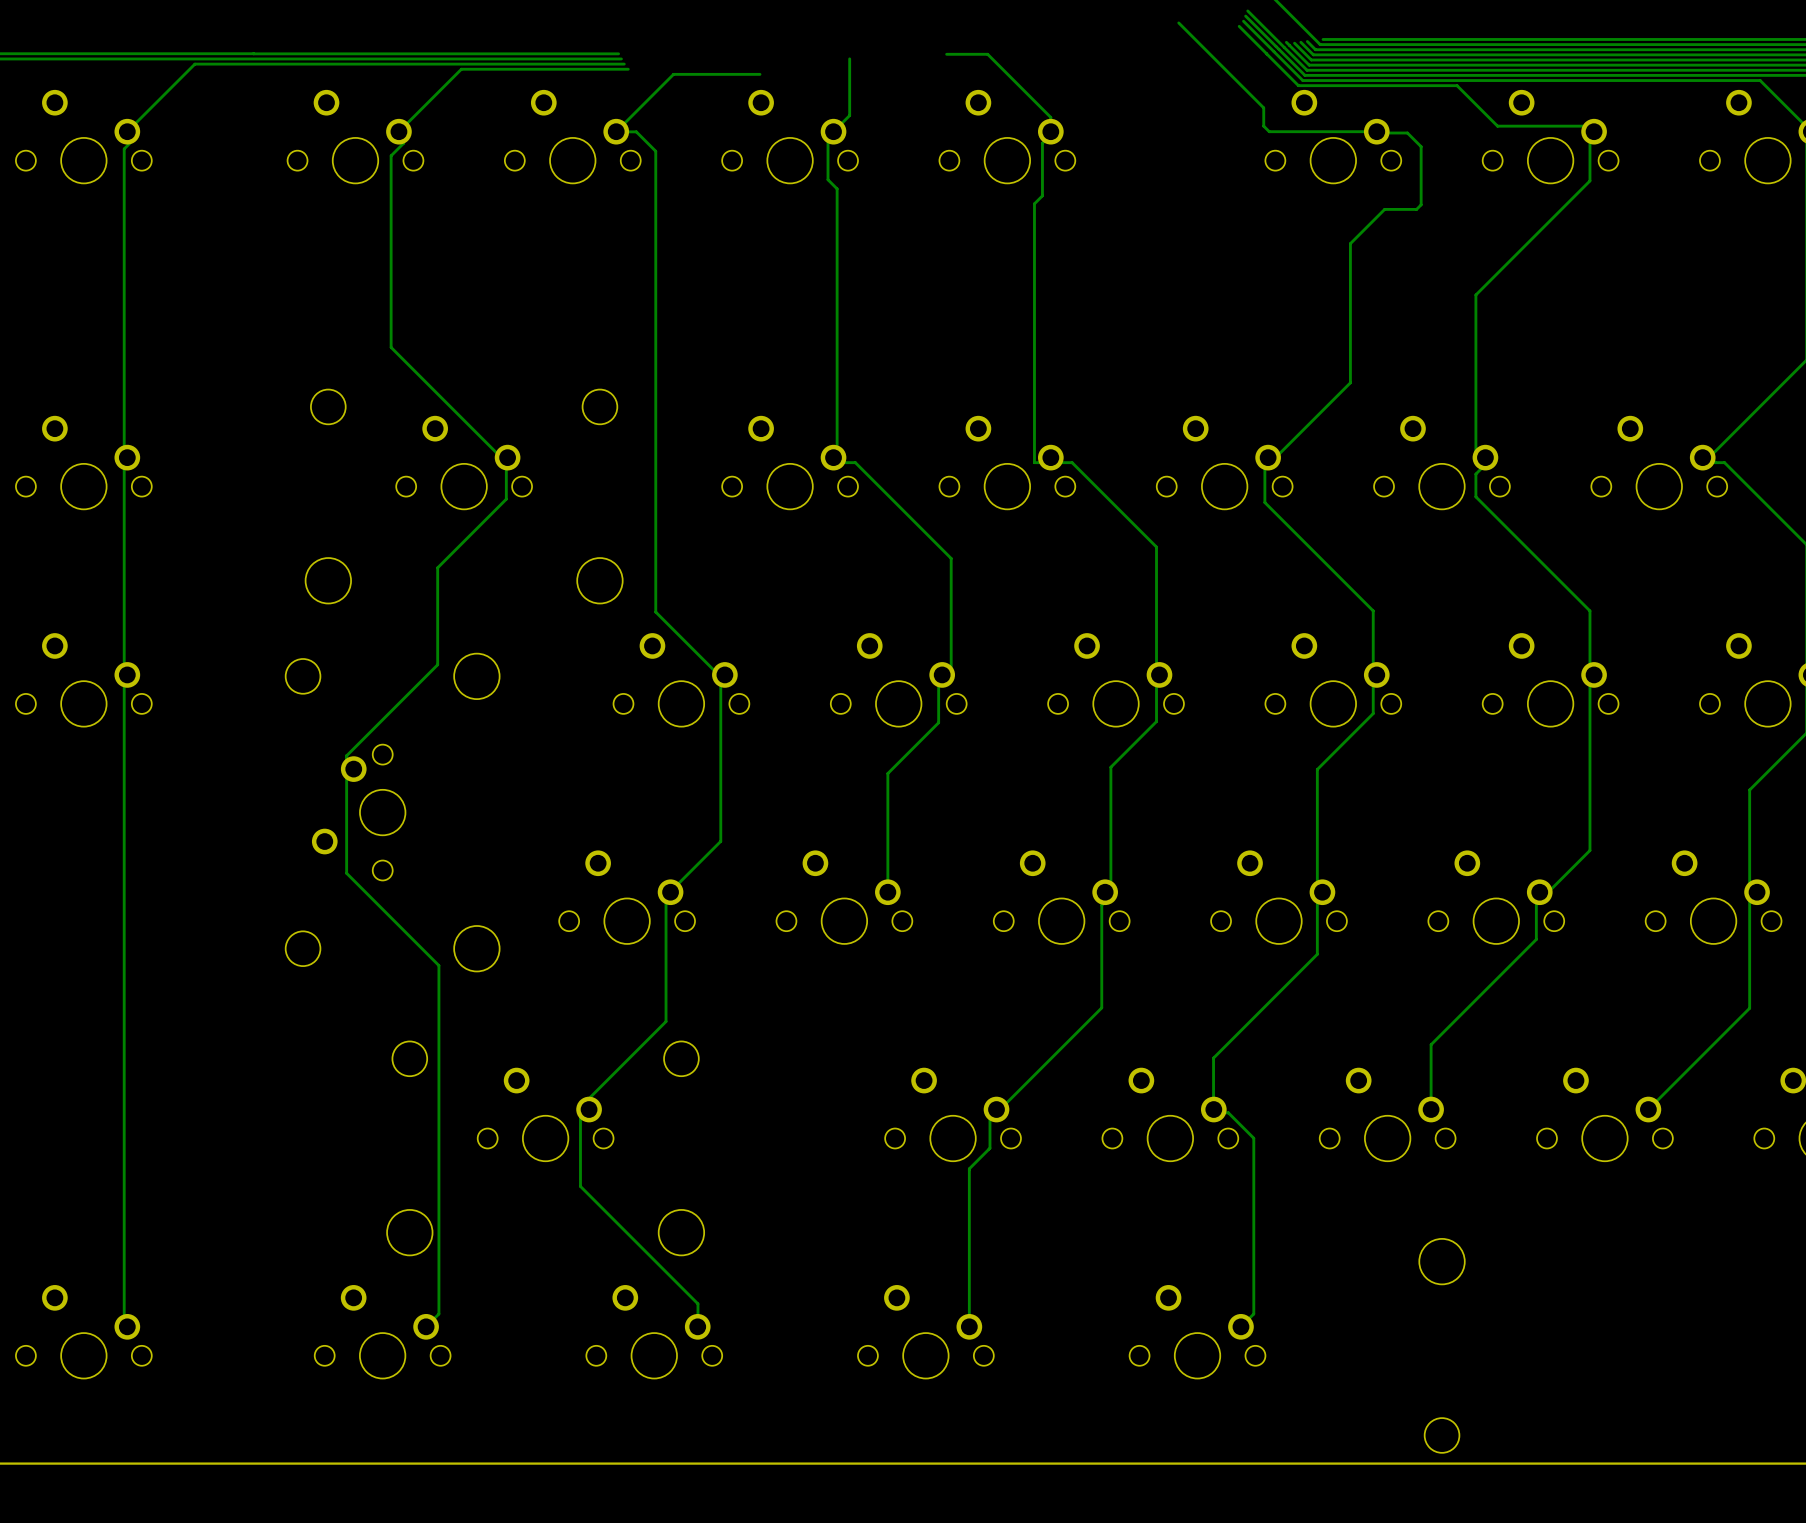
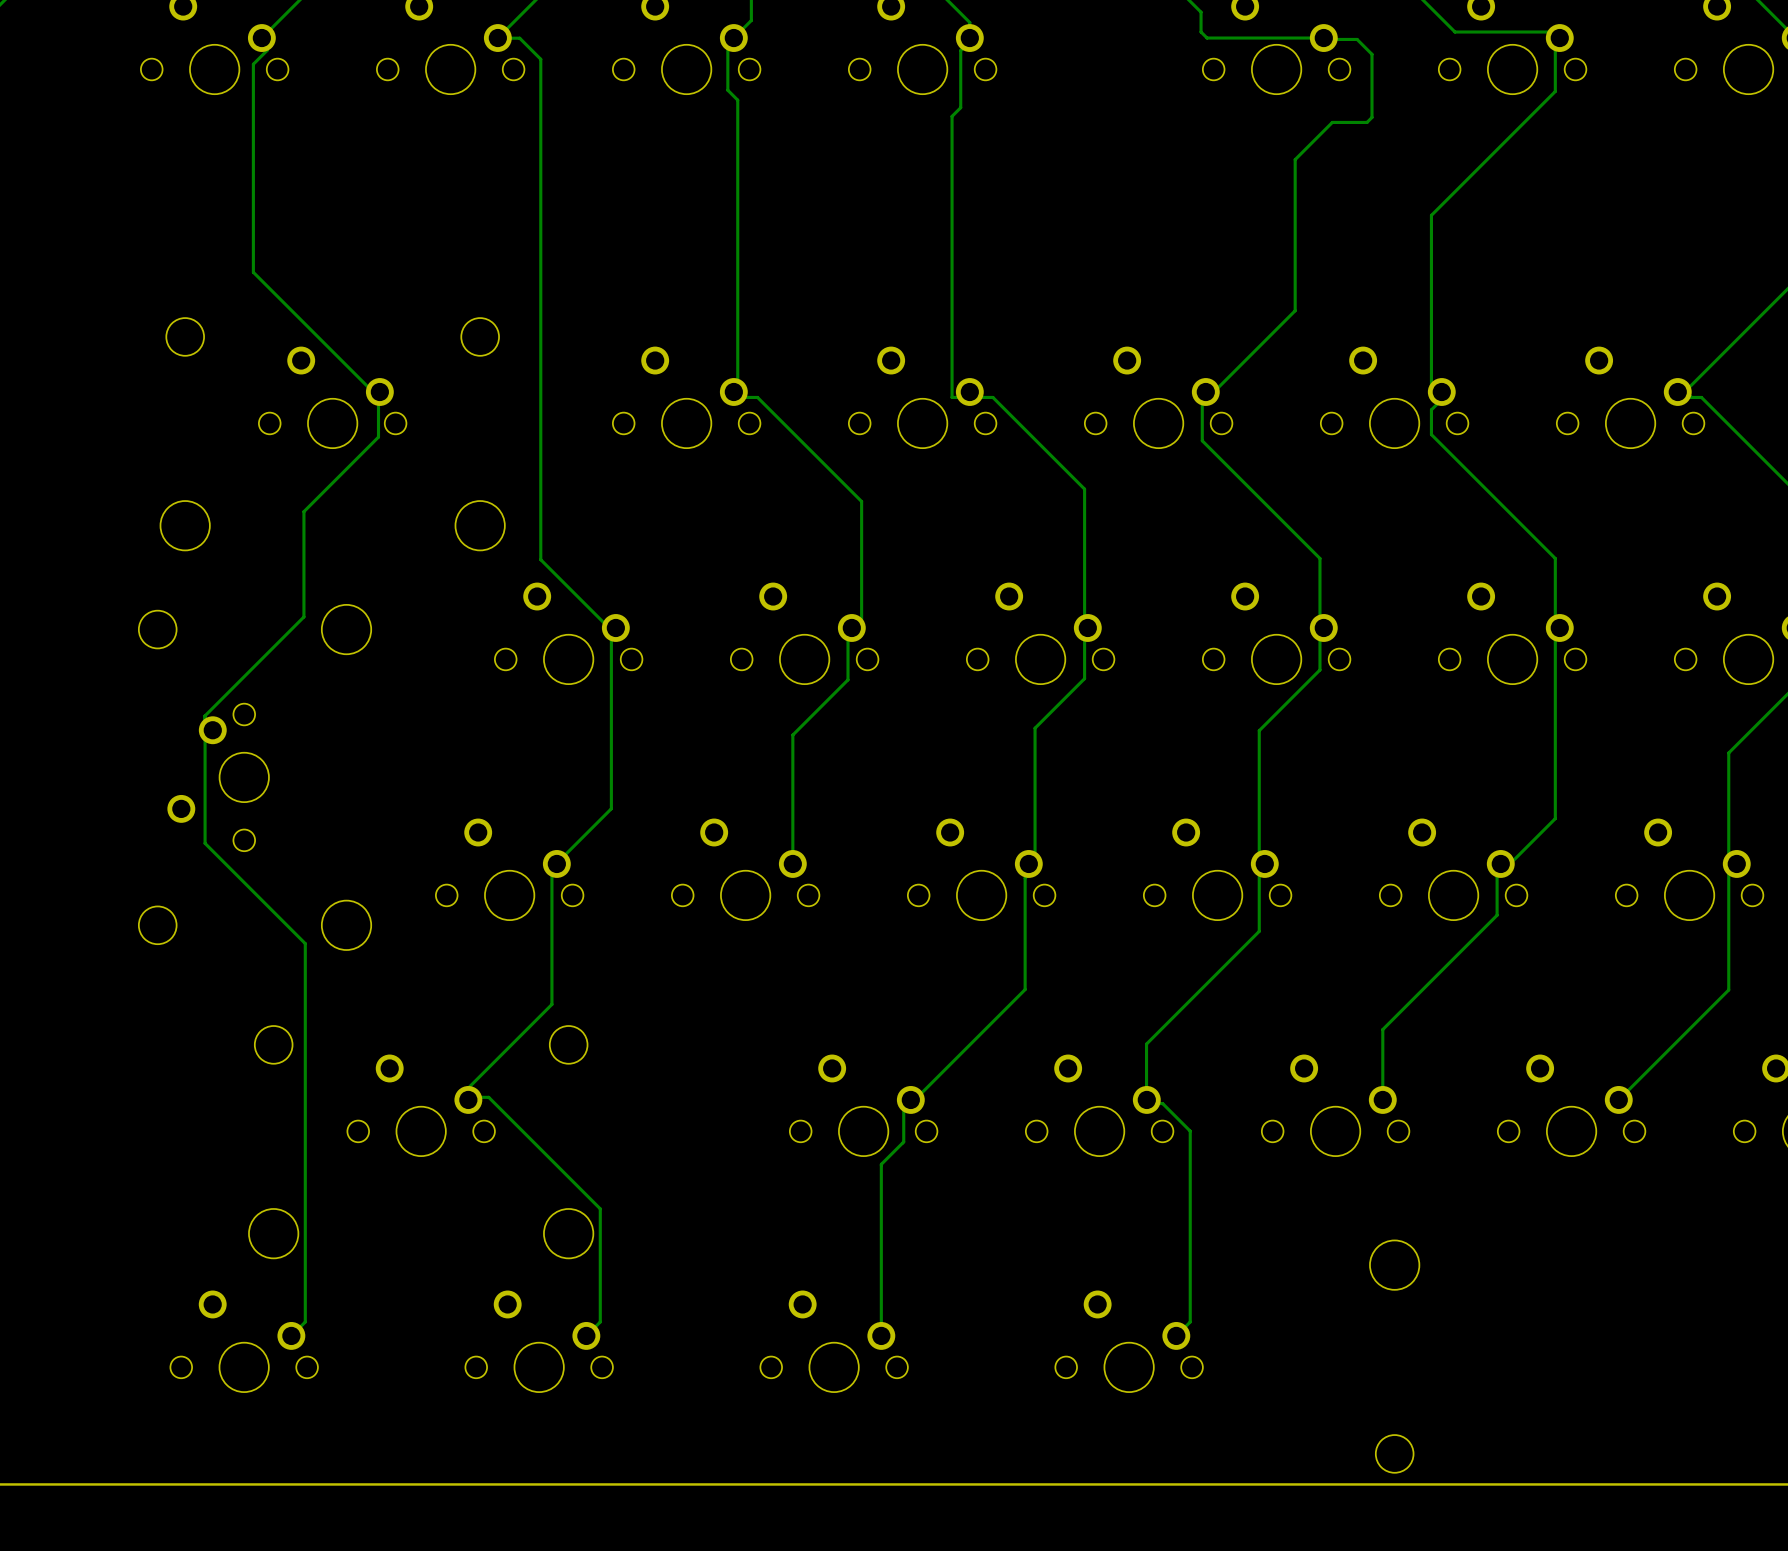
track: (580, 1107) (580, 1186) (697, 1303) (697, 1327) -> (459, 1097) (488, 1097) (600, 1208) (600, 1321) (586, 1335)

